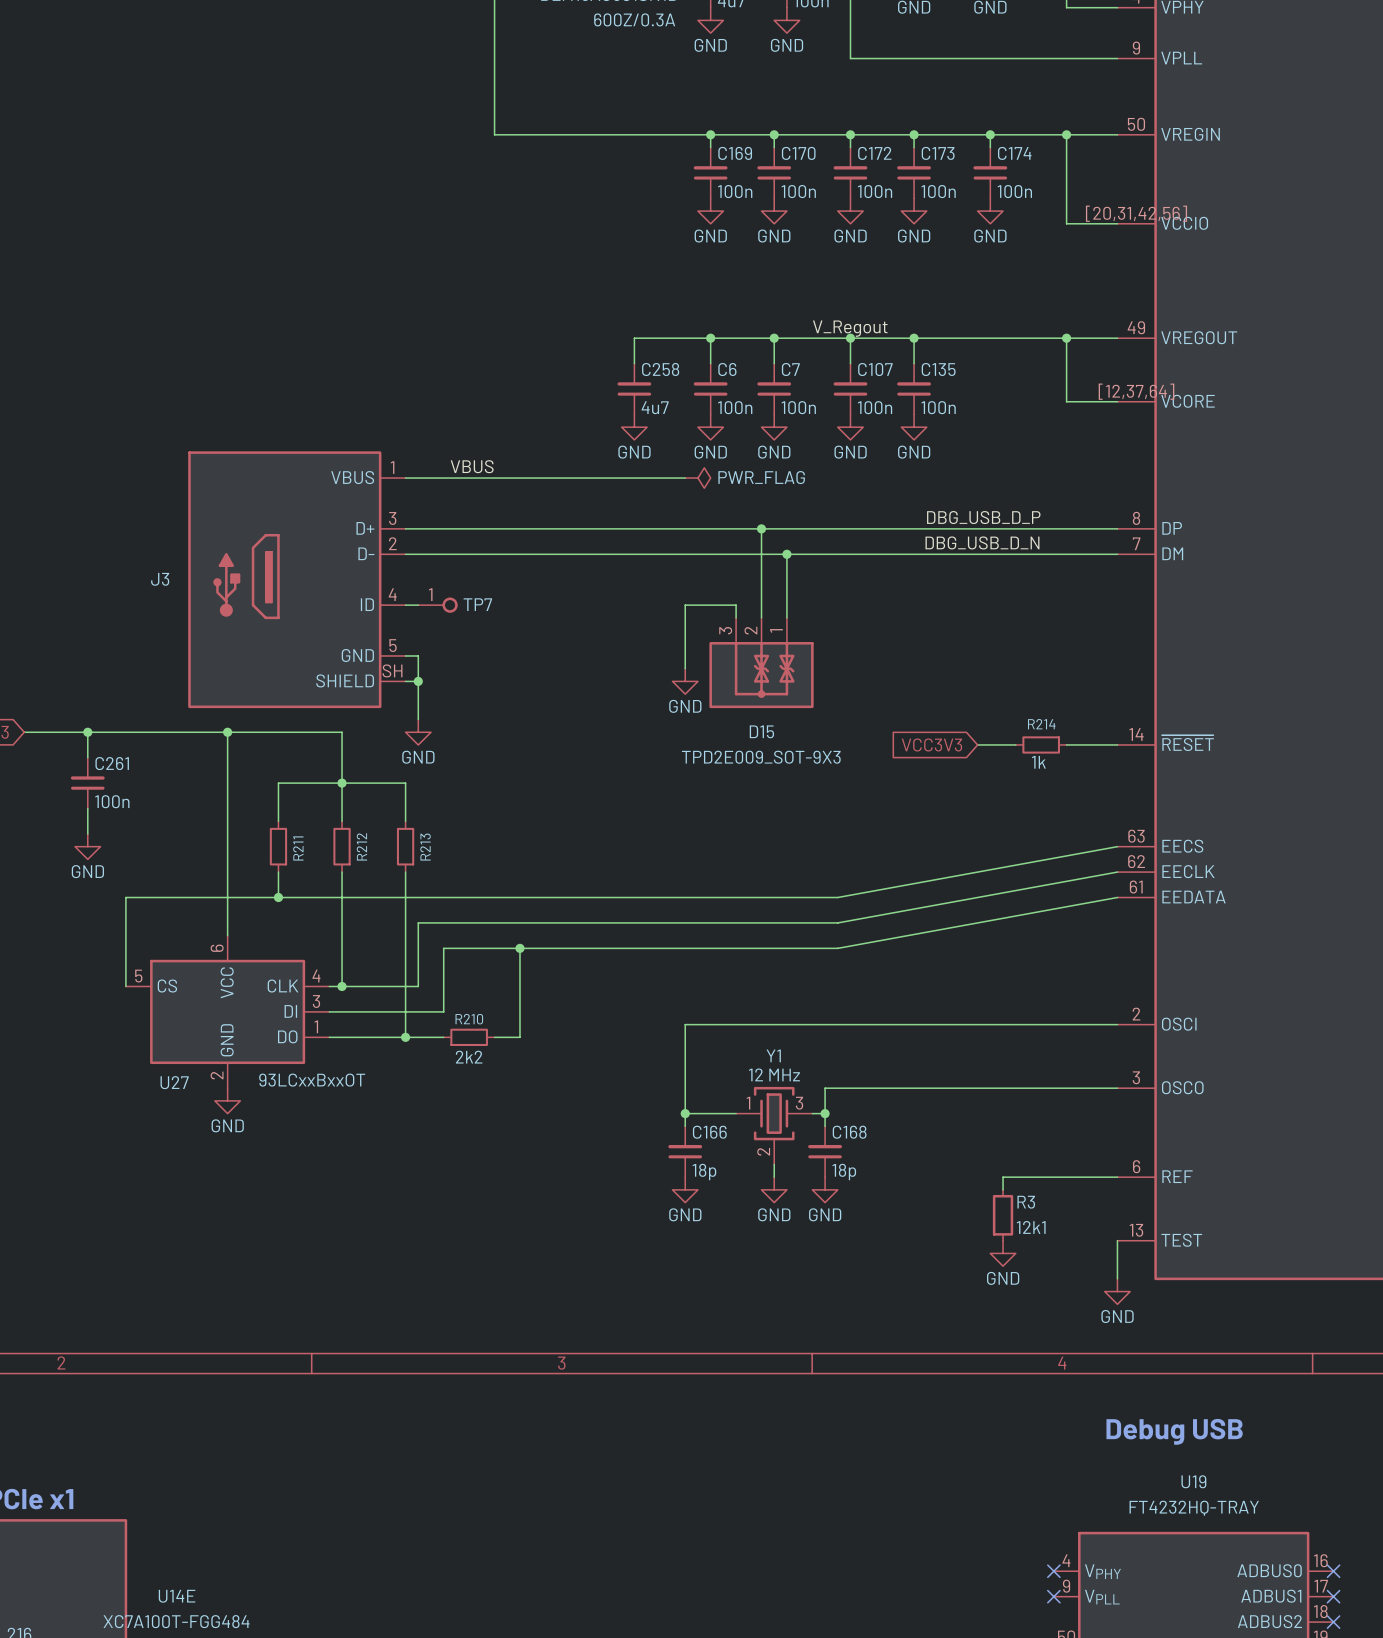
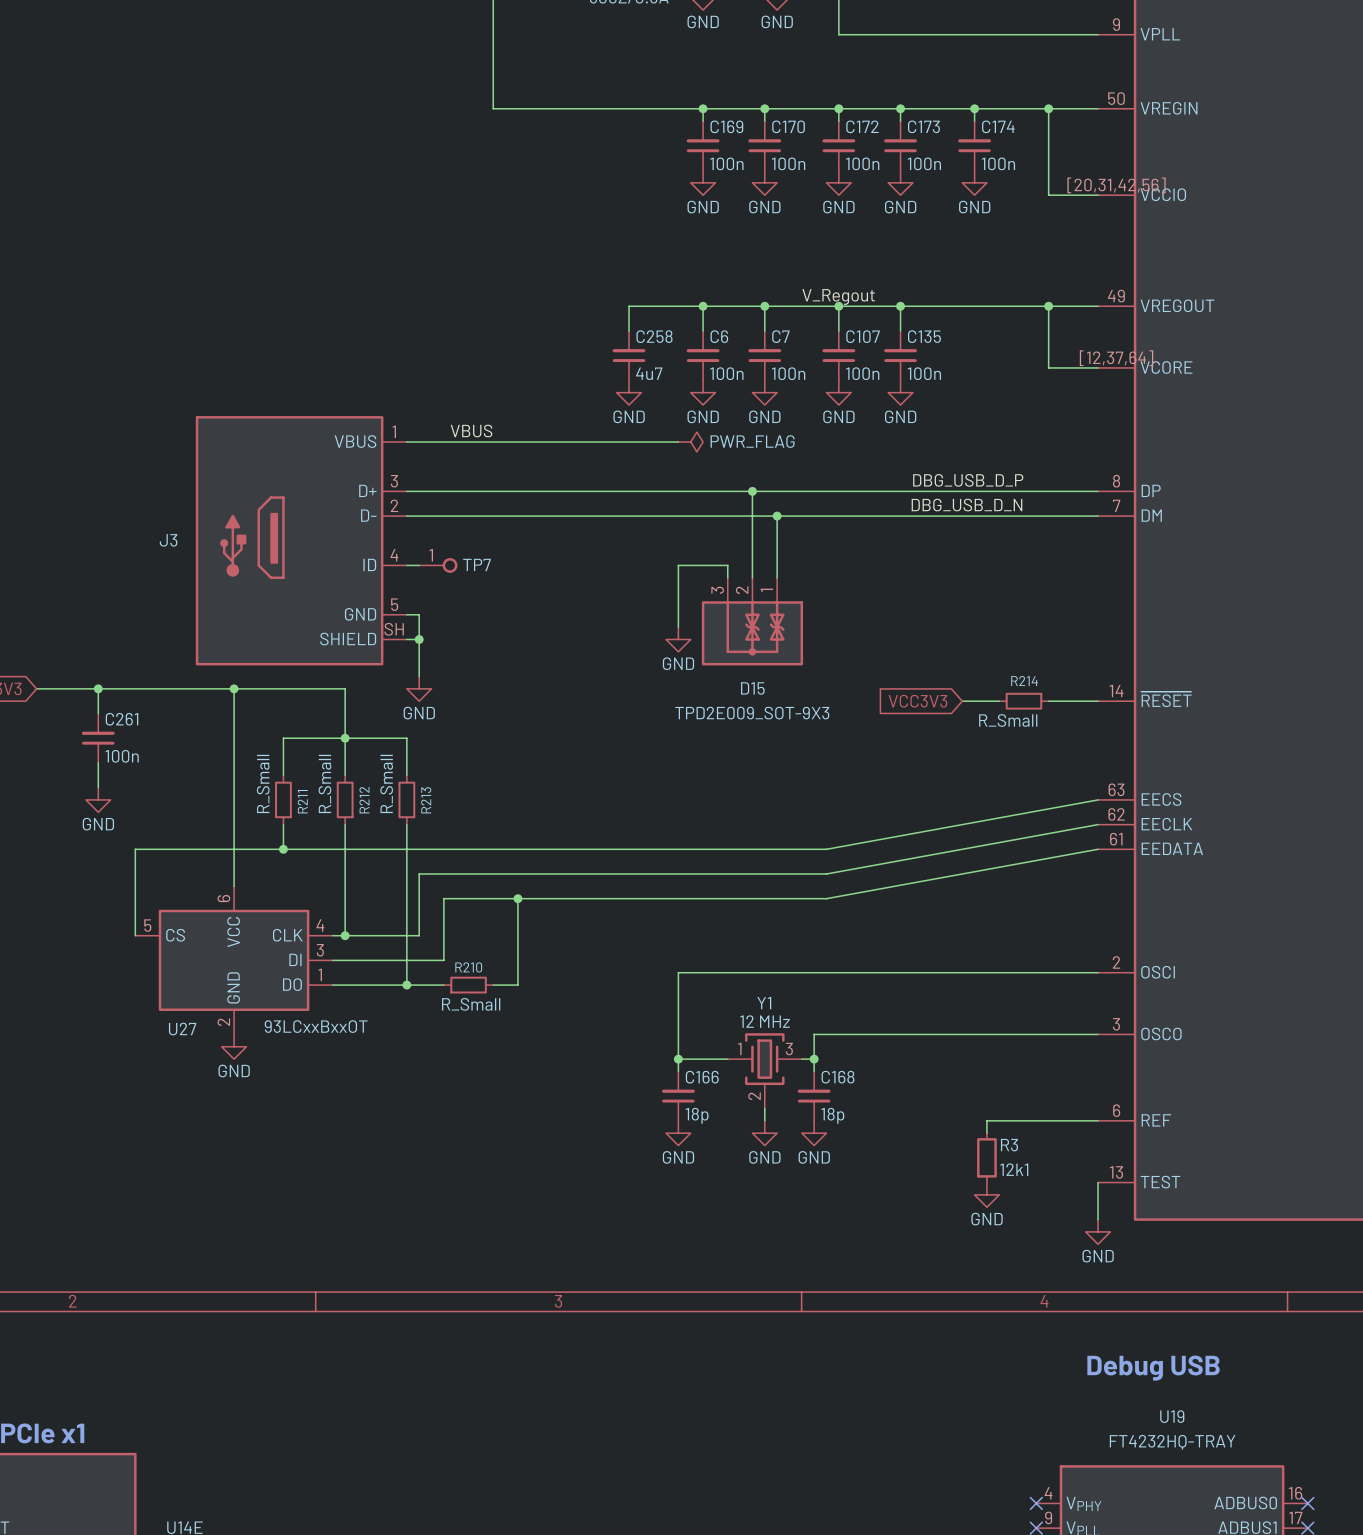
R214 text: 1k (1038, 762) -> none
R214 value: none -> R_Small (1008, 720)
R211 value: none -> R_Small (263, 783)
R212 value: none -> R_Small (324, 783)
R213 value: none -> R_Small (386, 783)
R210 text: 2k2 (469, 1057) -> none
R210 value: none -> R_Small (471, 1004)

